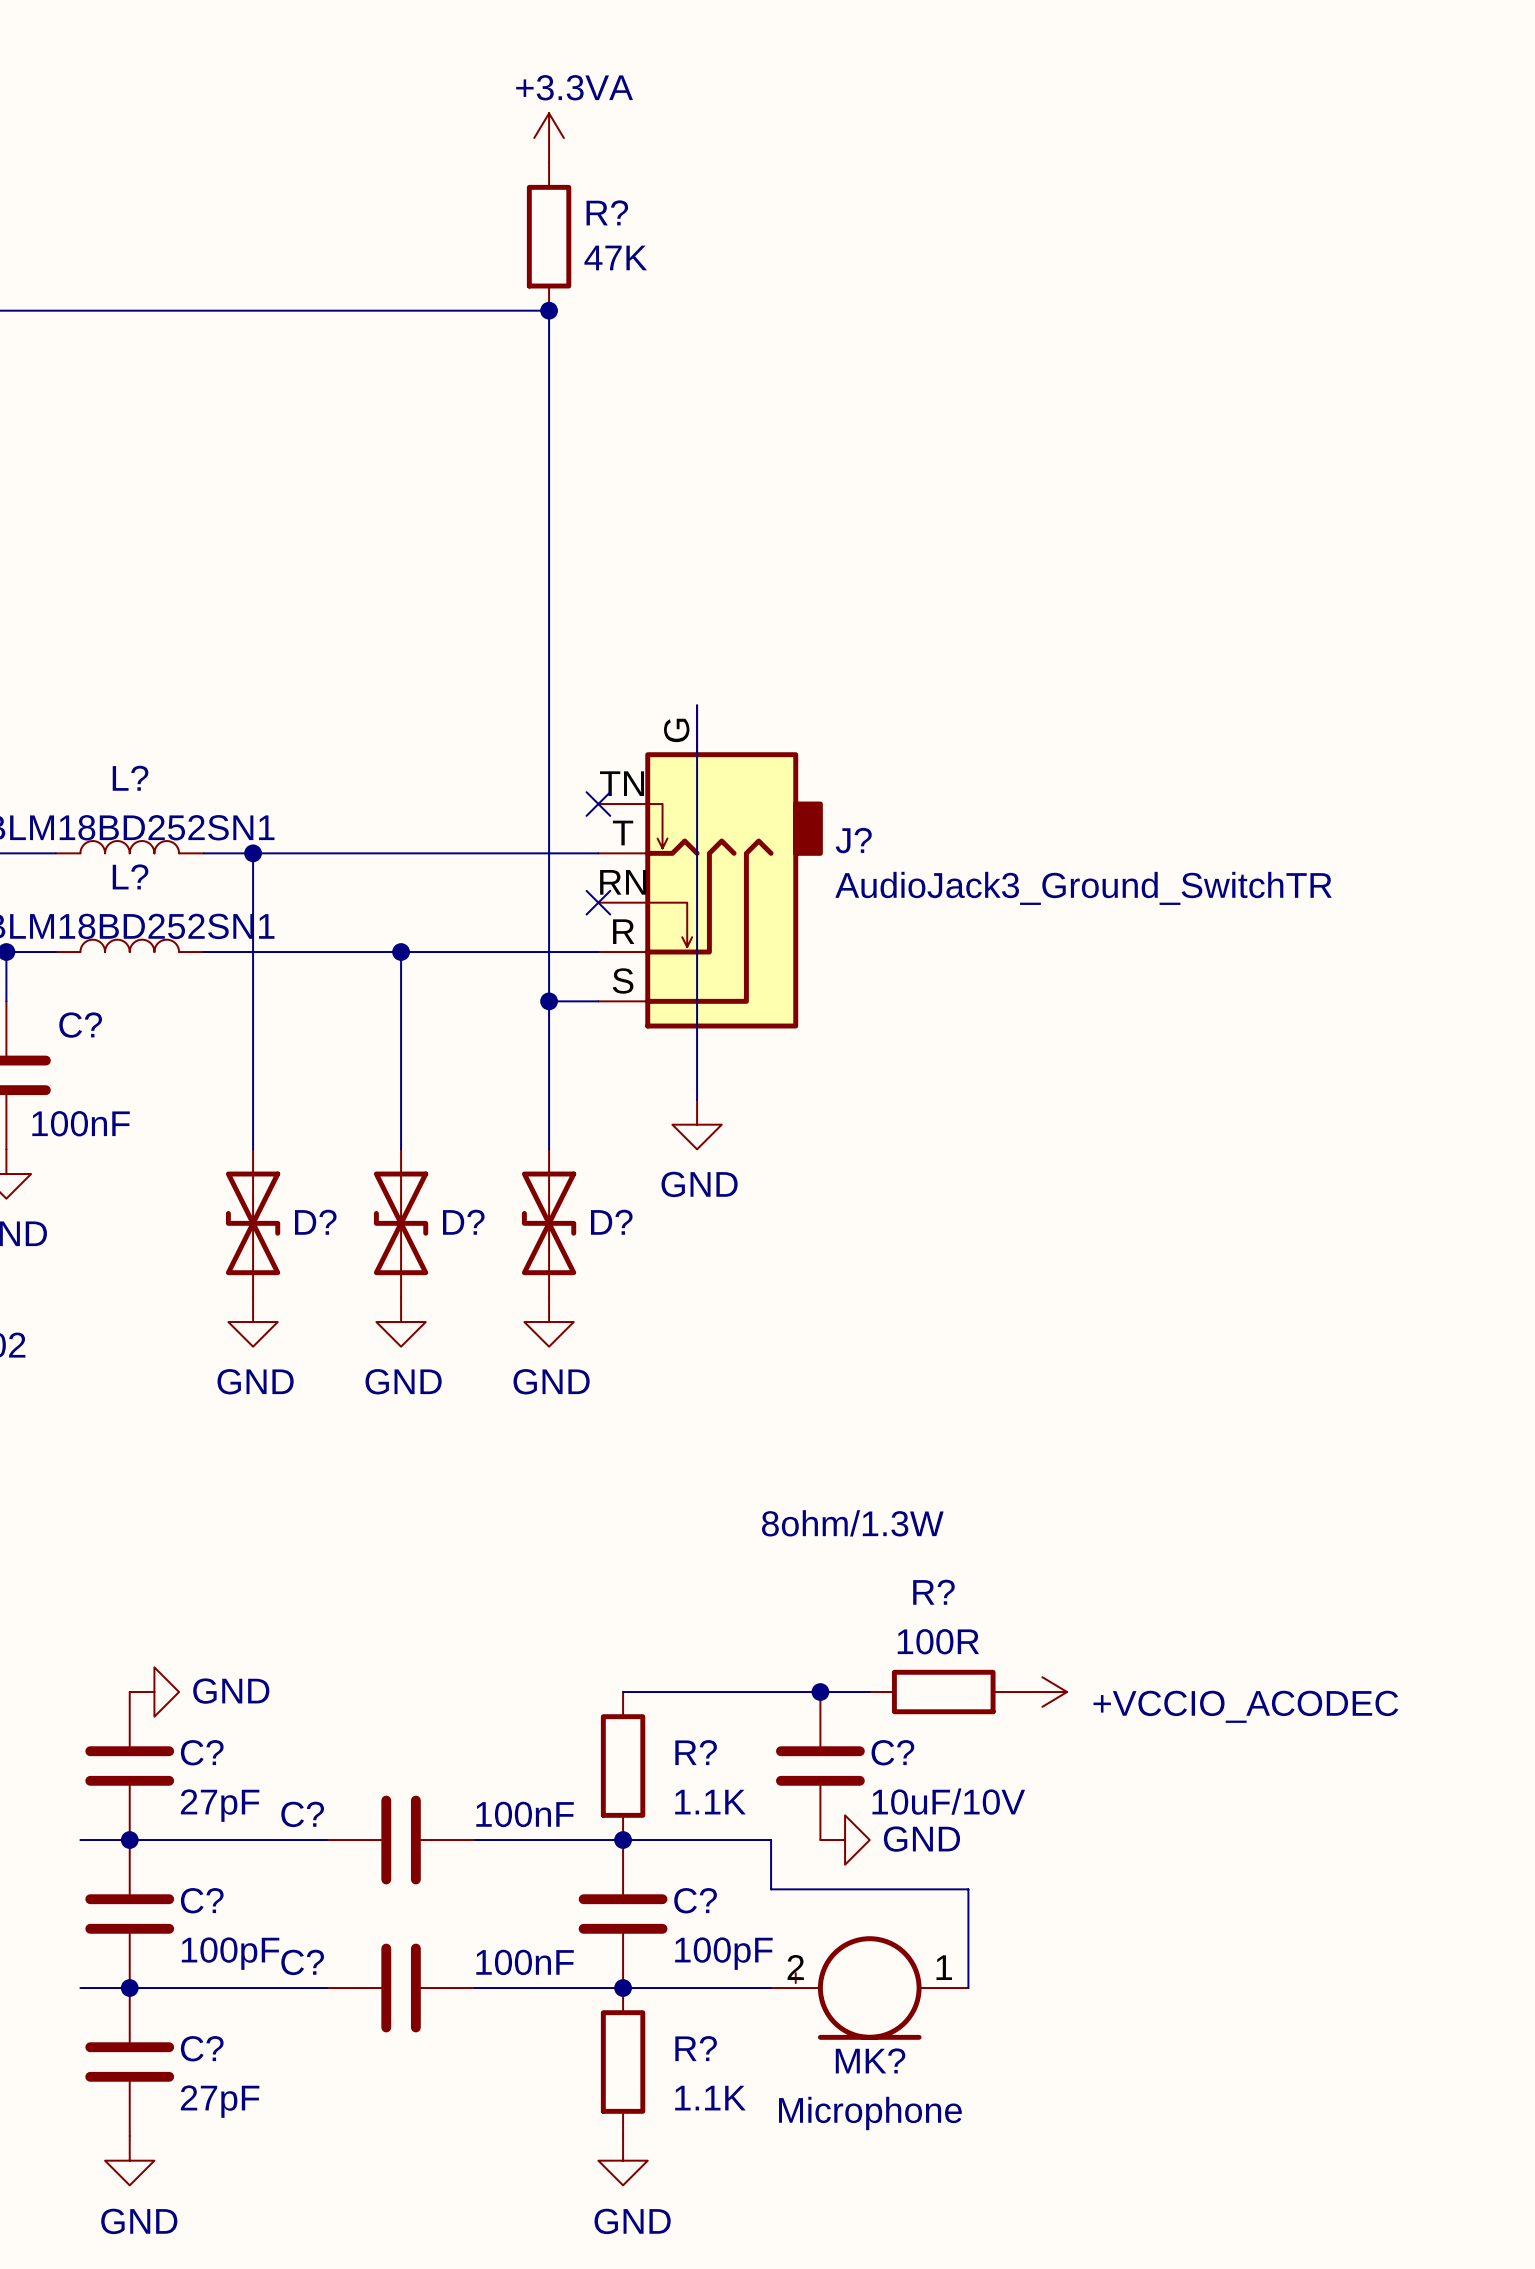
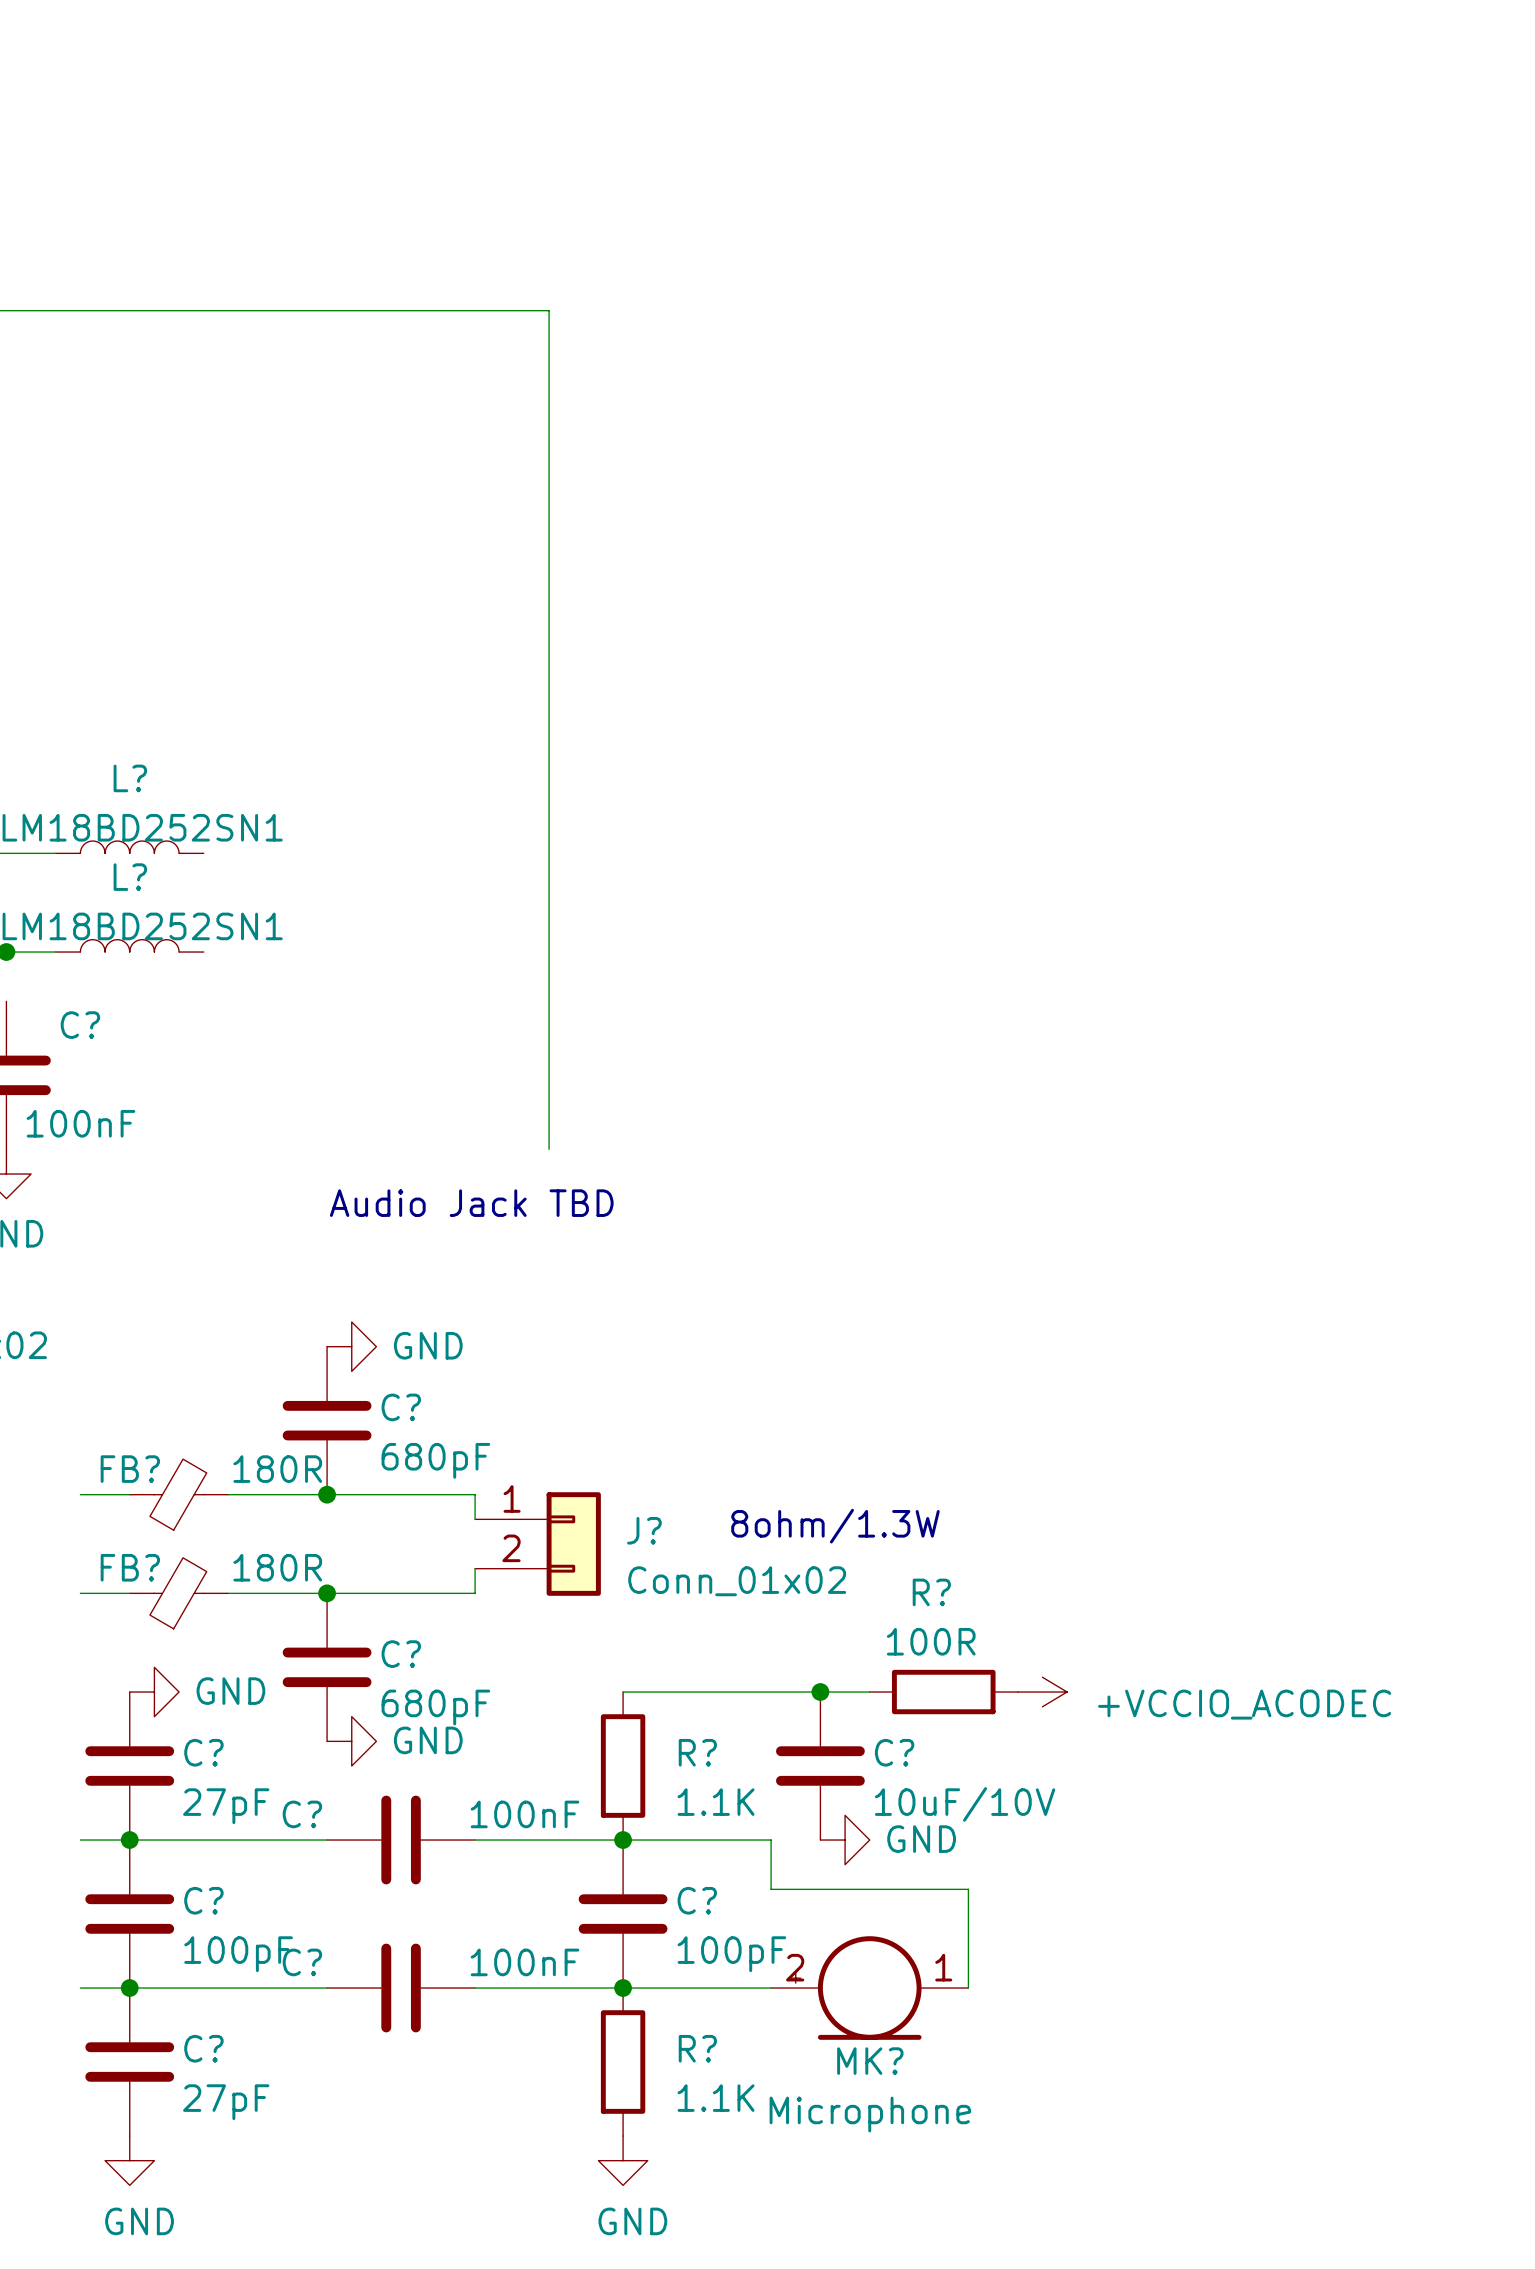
power symbol: +3.3VA (549, 138) -> none
R?: 47K (549, 236) -> none
junction: (549, 310) -> none
wire: (697, 705) (697, 1100) -> none
no-connect mark: (598, 804) -> none
wire: (203, 853) (598, 853) -> none
wire: (253, 853) (253, 1149) -> none
junction: (253, 853) -> none
J?: AudioJack3_Ground_SwitchTR (710, 866) -> none
no-connect mark: (598, 902) -> none
wire: (6, 952) (6, 1001) -> none
wire: (203, 952) (598, 952) -> none
wire: (401, 952) (401, 1149) -> none
junction: (401, 952) -> none
wire: (549, 1001) (598, 1001) -> none
junction: (549, 1001) -> none
power symbol: GND (697, 1124) -> none
text: none -> Audio Jack TBD (471, 1203)
D?: (253, 1223) -> none
D?: (401, 1223) -> none
D?: (549, 1223) -> none
power symbol: GND (253, 1322) -> none
power symbol: GND (401, 1322) -> none
power symbol: GND (549, 1322) -> none
power symbol: none -> GND (351, 1346)
C?: none -> 680pF (327, 1420)
wire: none -> (80, 1494) (129, 1494)
FB?: none -> 180R (179, 1494)
wire: none -> (228, 1494) (475, 1494) (475, 1519)
junction: none -> (327, 1494)
J?: none -> Conn_01x02 (537, 1544)
wire: none -> (475, 1568) (475, 1593) (228, 1593)
wire: none -> (80, 1593) (129, 1593)
FB?: none -> 180R (179, 1593)
junction: none -> (327, 1593)
C?: none -> 680pF (327, 1667)
power symbol: none -> GND (351, 1741)

